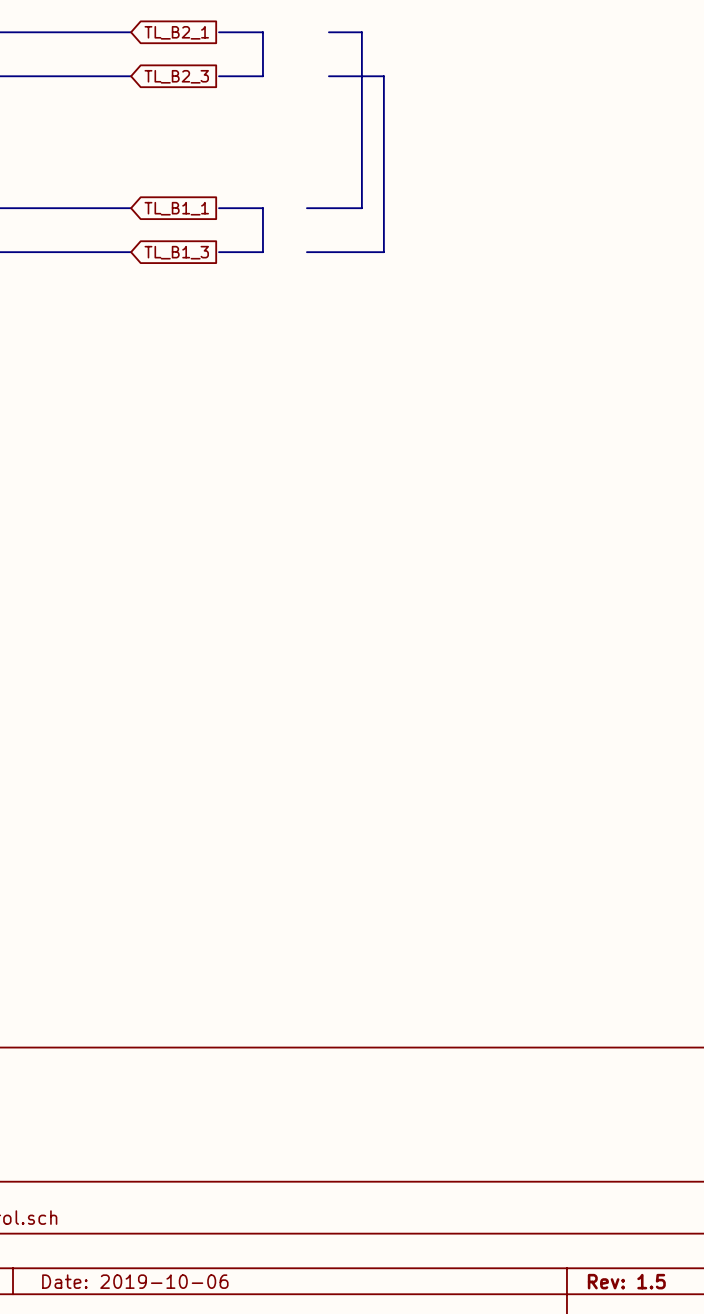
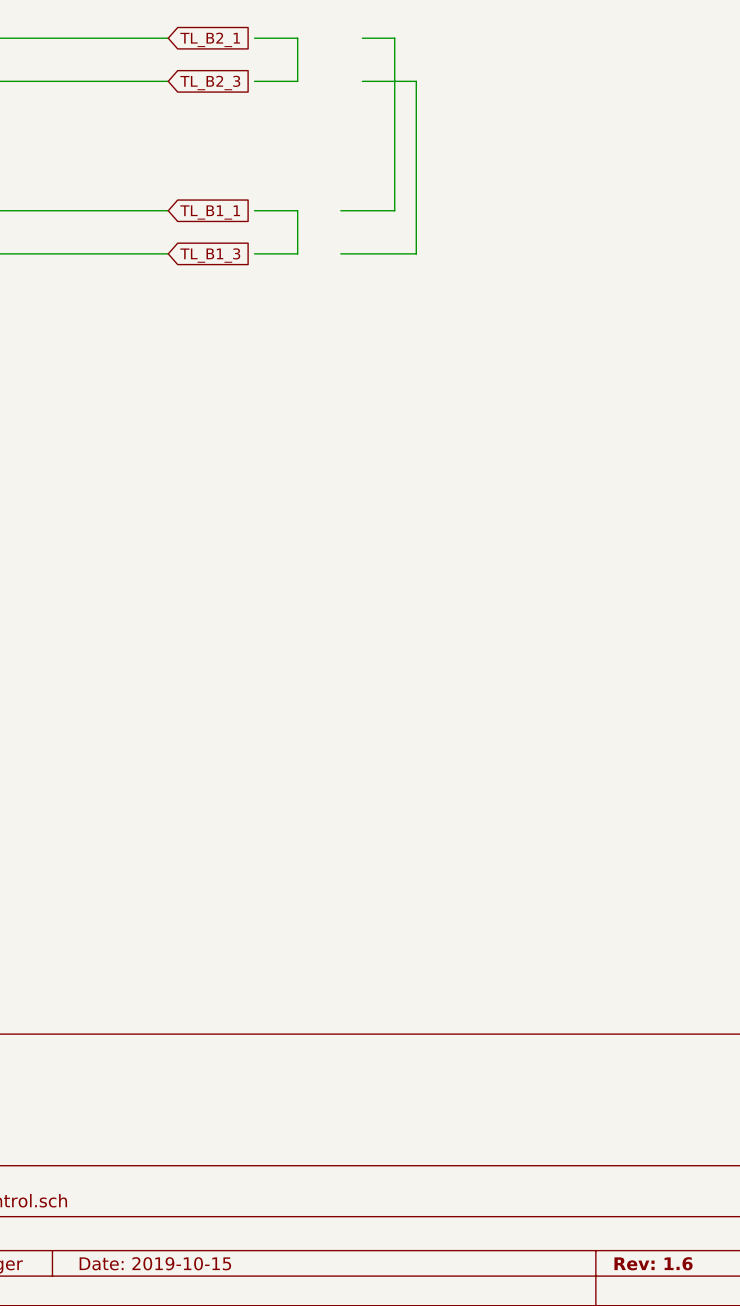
title block: Date: 2019-10-06 (135, 1281) -> Date: 2019-10-15 (155, 1263)
title block: Rev: 1.5 (626, 1281) -> Rev: 1.6 (653, 1263)

